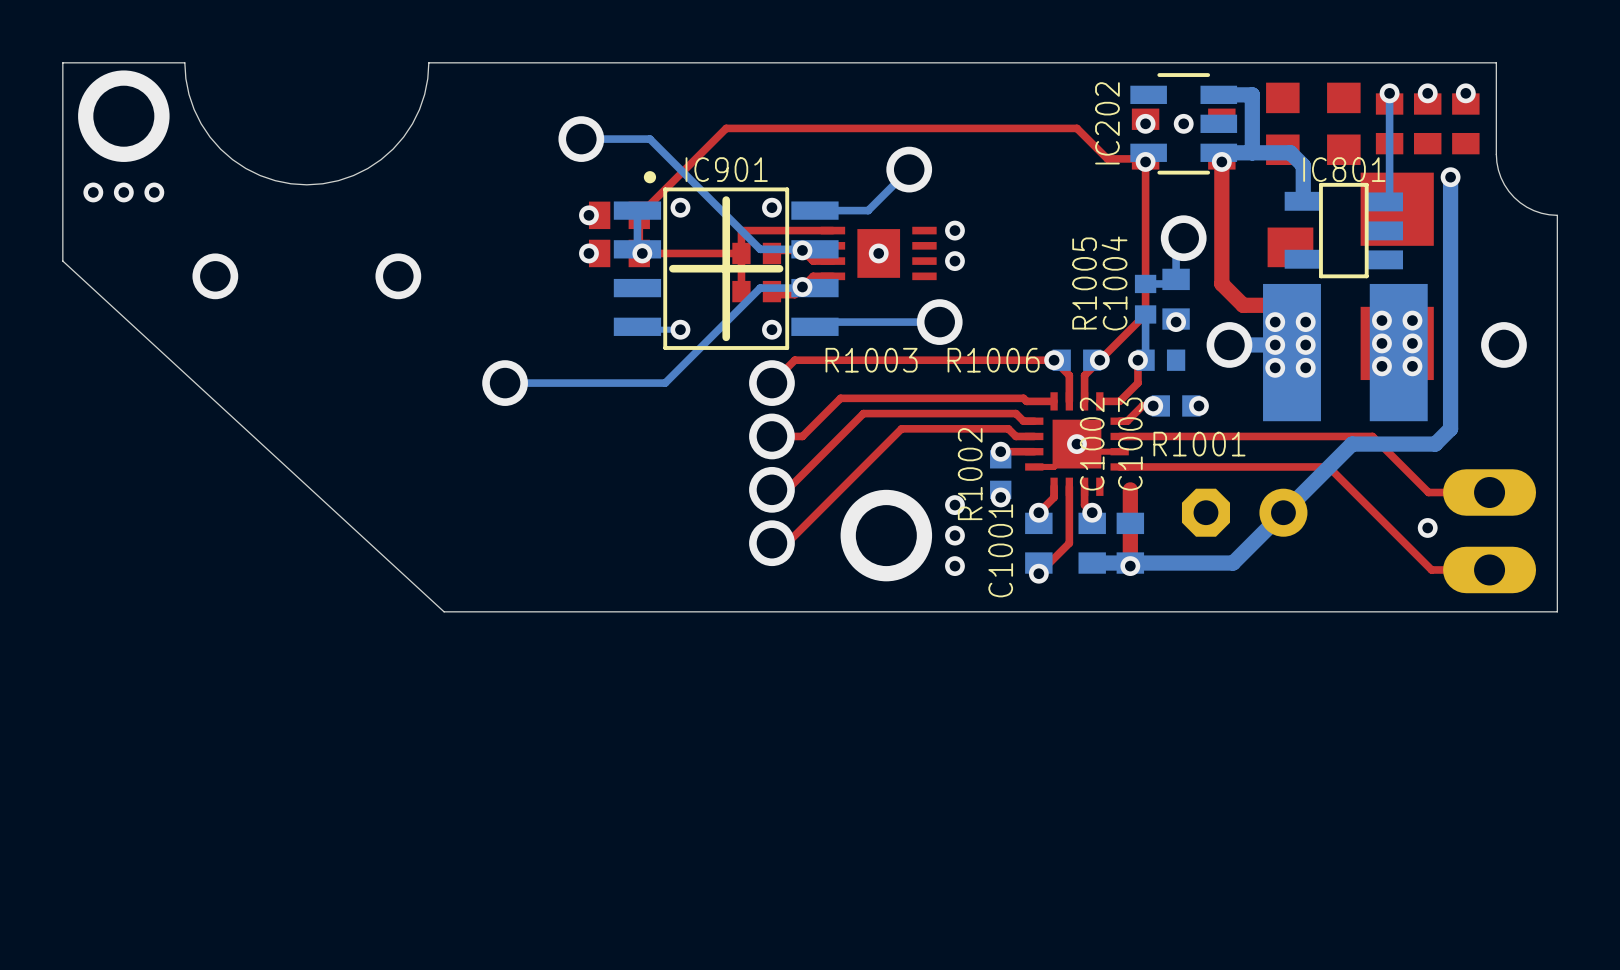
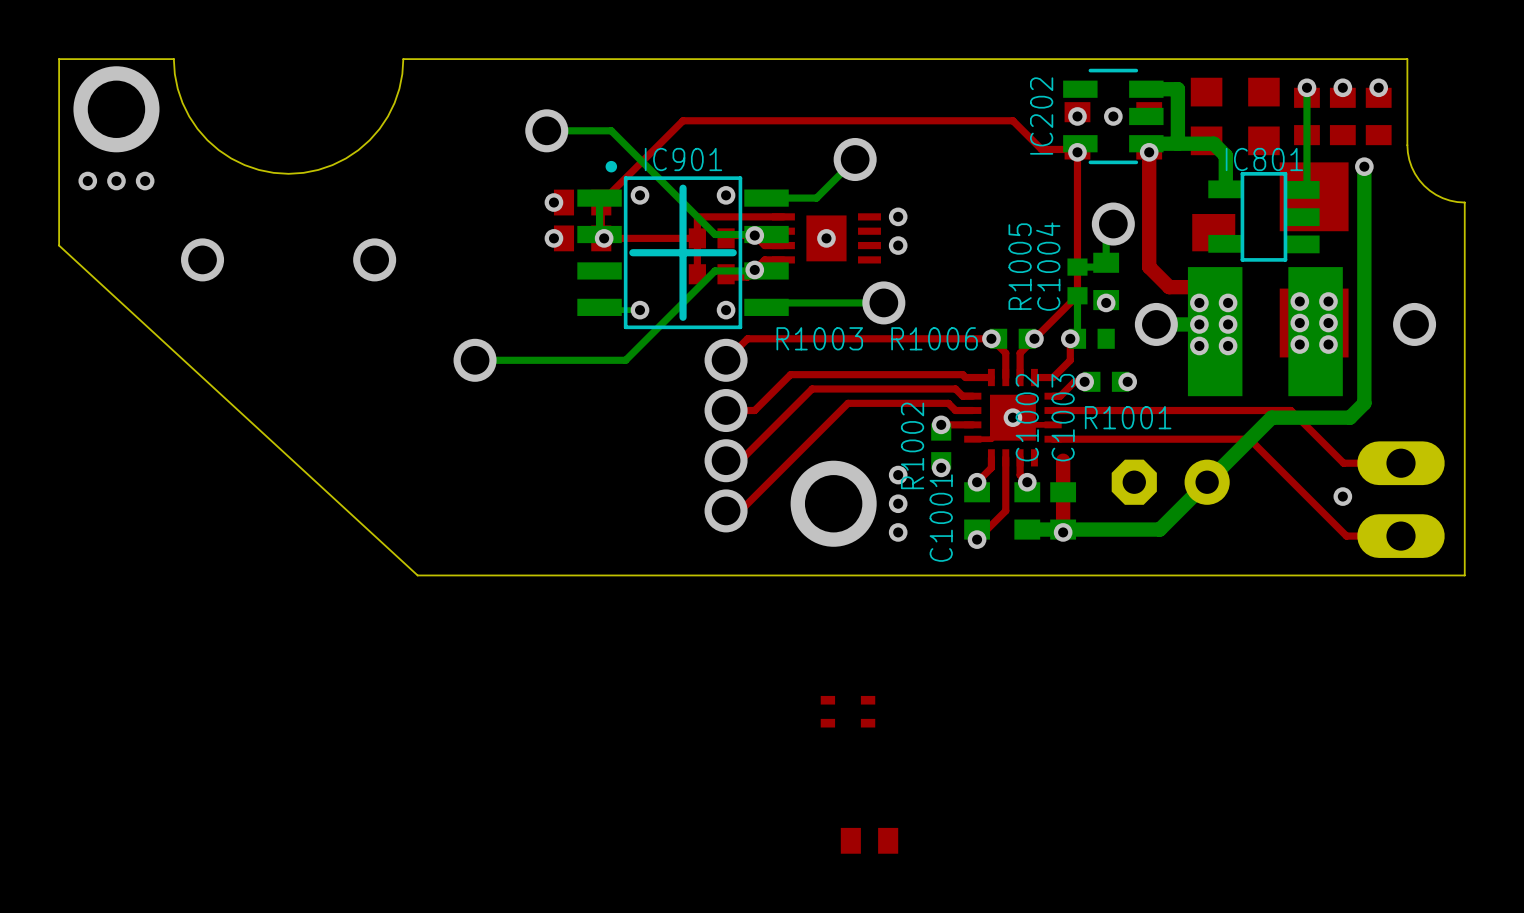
part: none -> (847, 711)
part: none -> (869, 840)

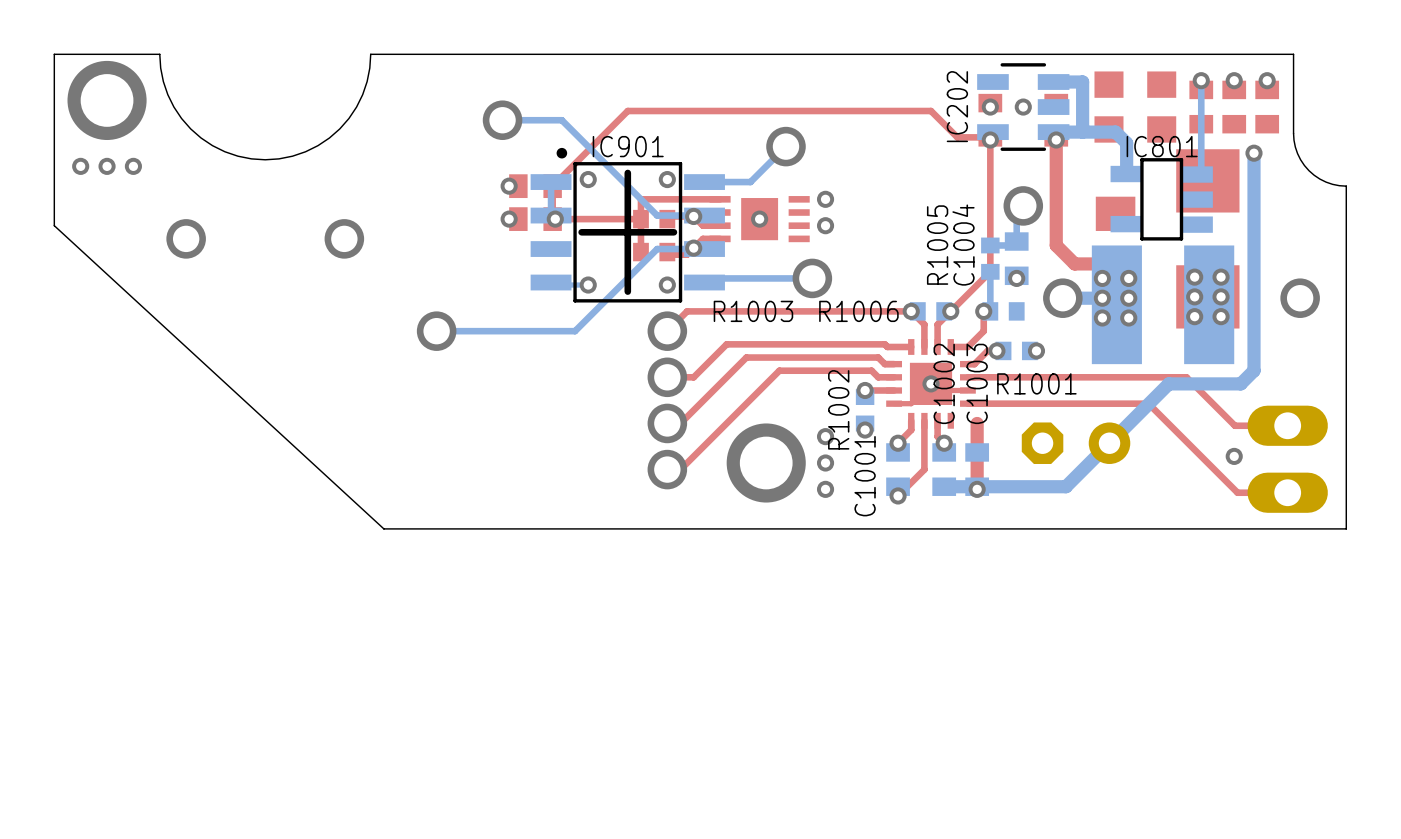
part: (847, 711) -> none
part: (869, 840) -> none

